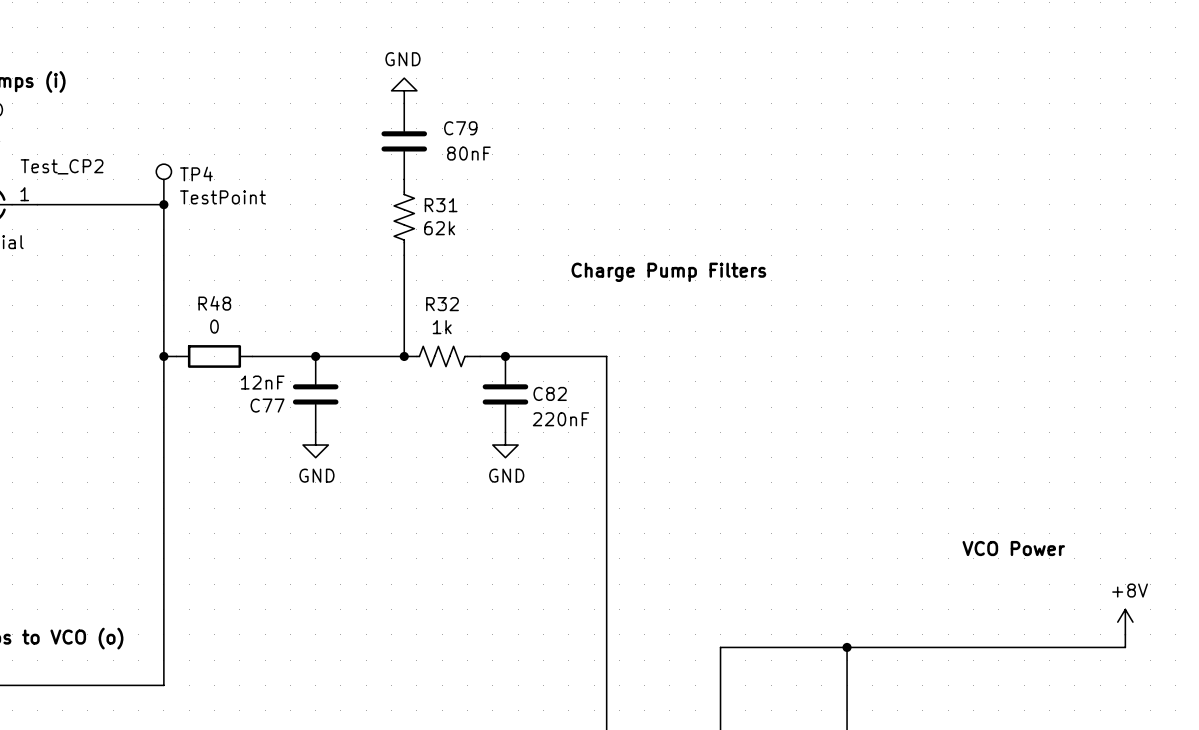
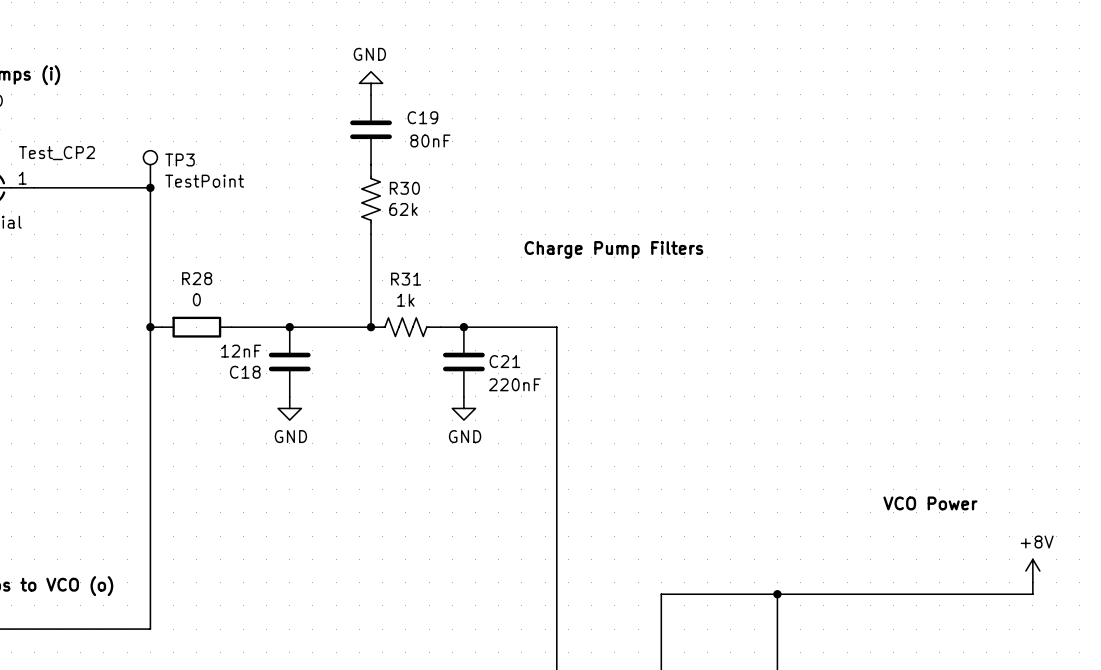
C79 name: C79 (460, 128) -> C19 (422, 117)
TP4 name: TP4 (196, 174) -> TP3 (180, 160)
R31 name: R31 (441, 205) -> R30 (404, 188)
R48 name: R48 (214, 303) -> R28 (197, 278)
R32 name: R32 (442, 304) -> R31 (406, 279)
C82 name: C82 (550, 393) -> C21 (504, 361)
C77 name: C77 (267, 405) -> C18 (245, 372)

